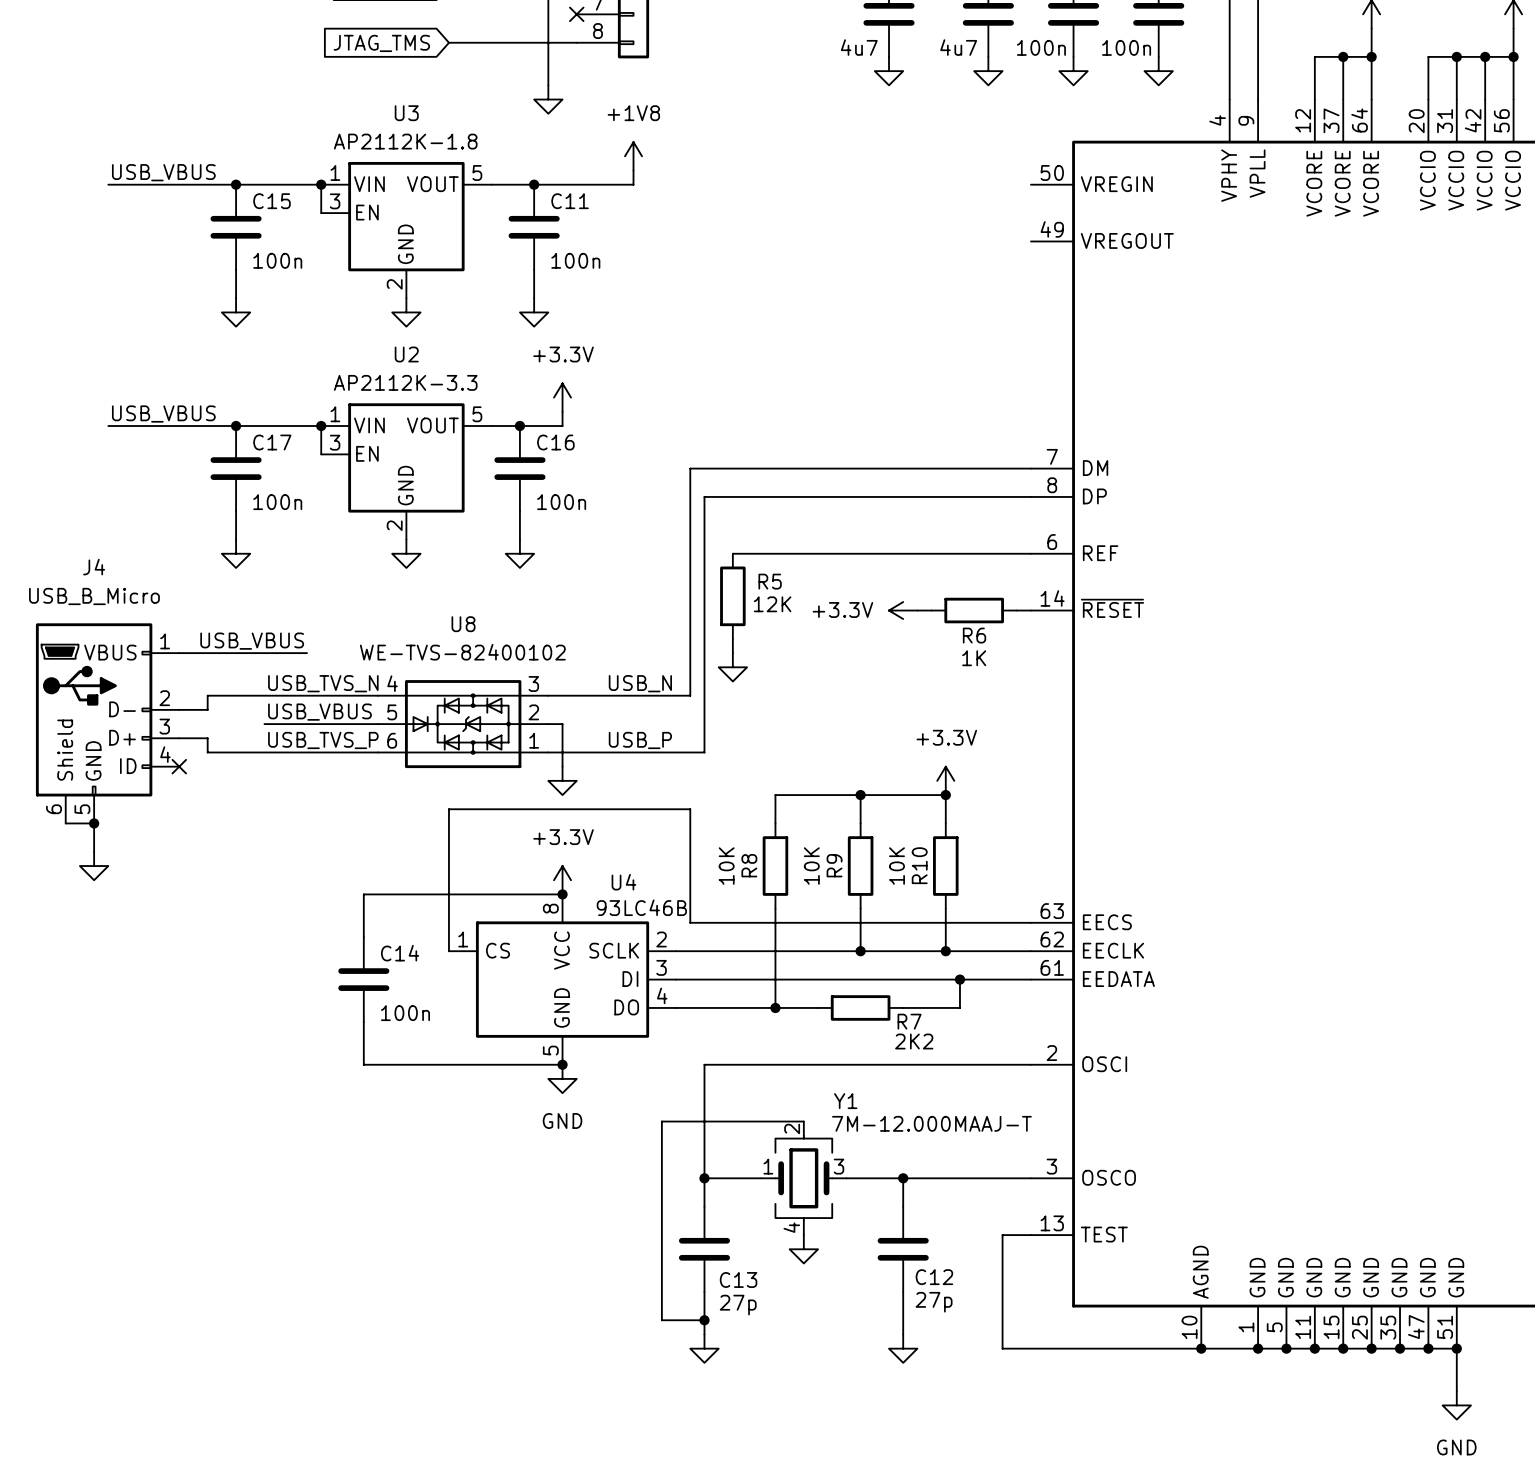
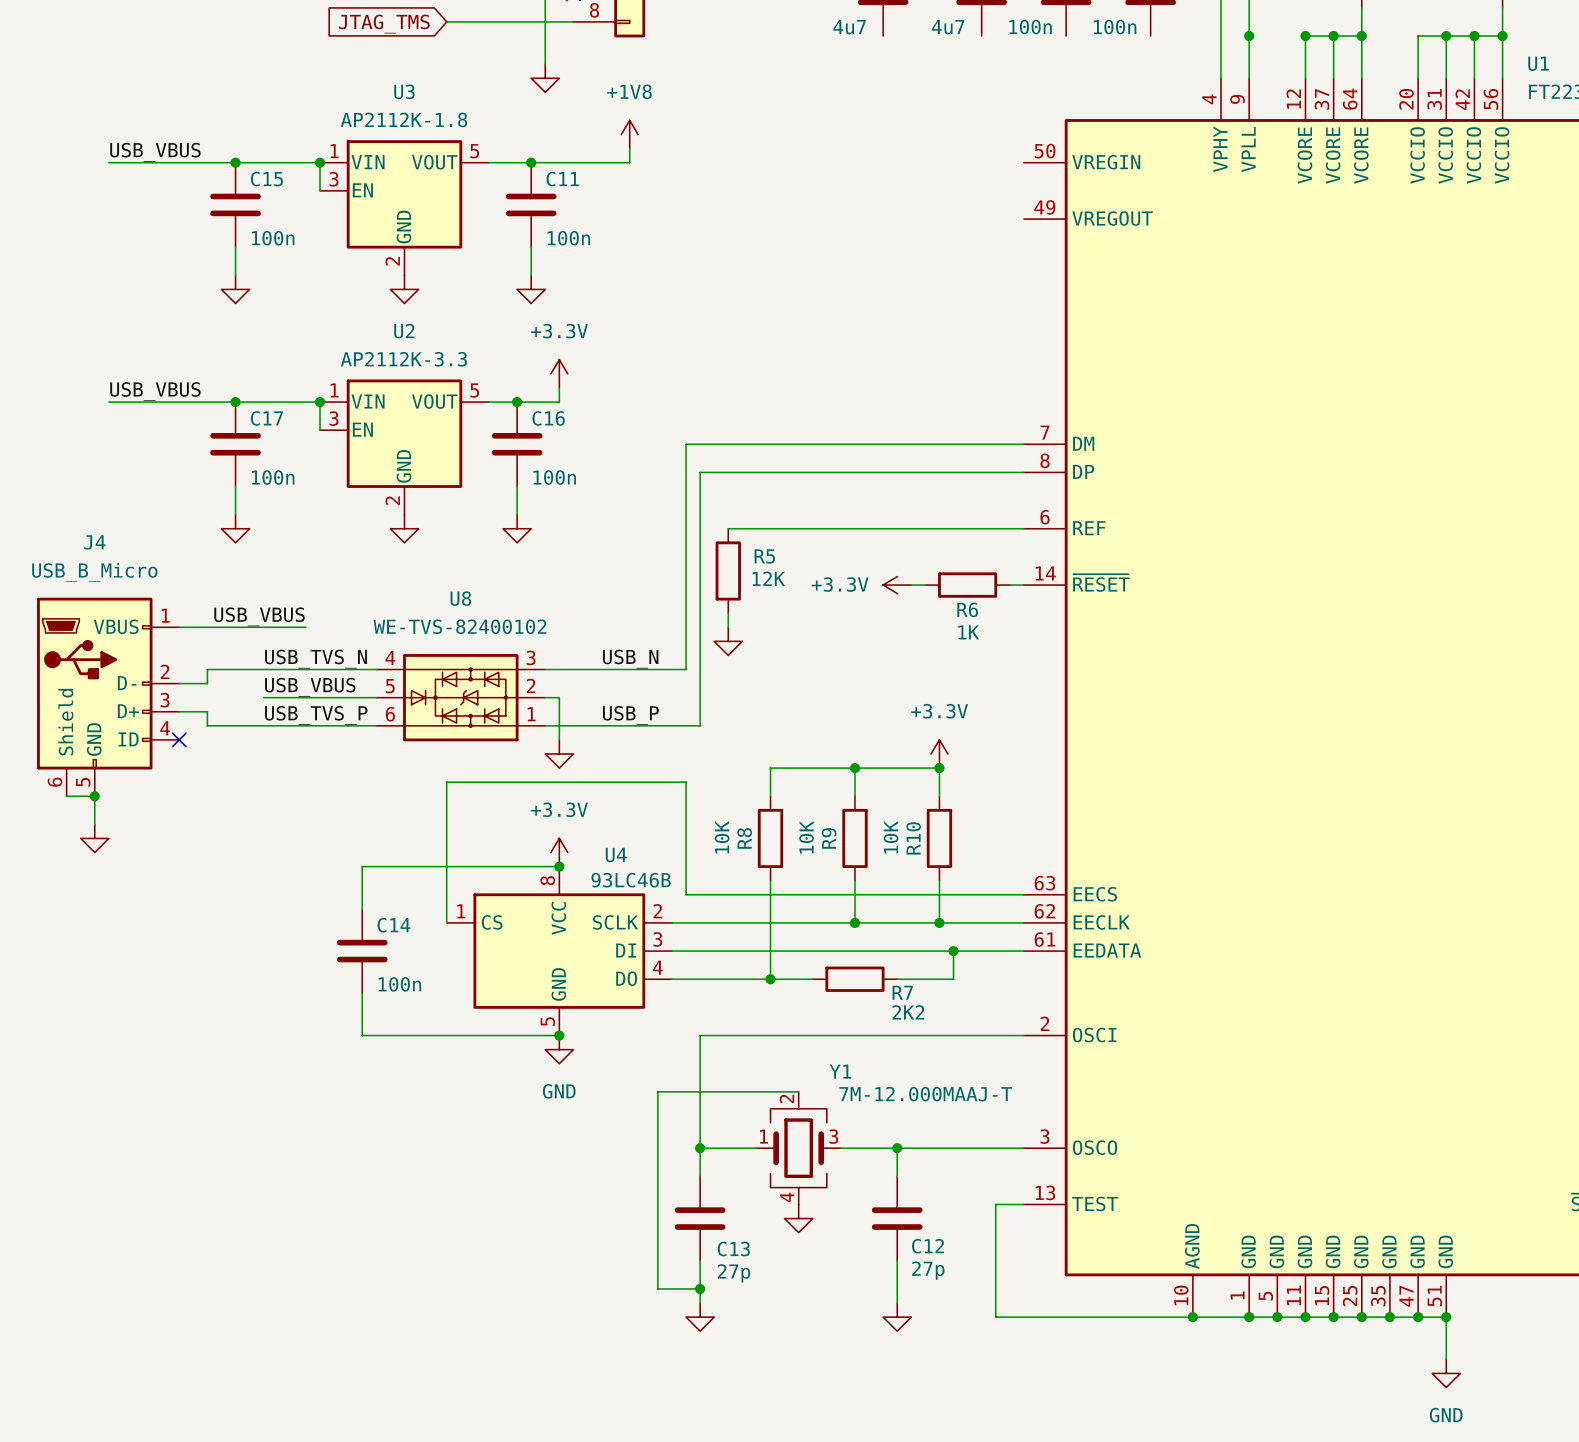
junction: none -> (1249, 36)
junction: none -> (1305, 36)
power symbol: (889, 71) -> none
power symbol: (988, 71) -> none
power symbol: (1073, 71) -> none
power symbol: (1158, 71) -> none

